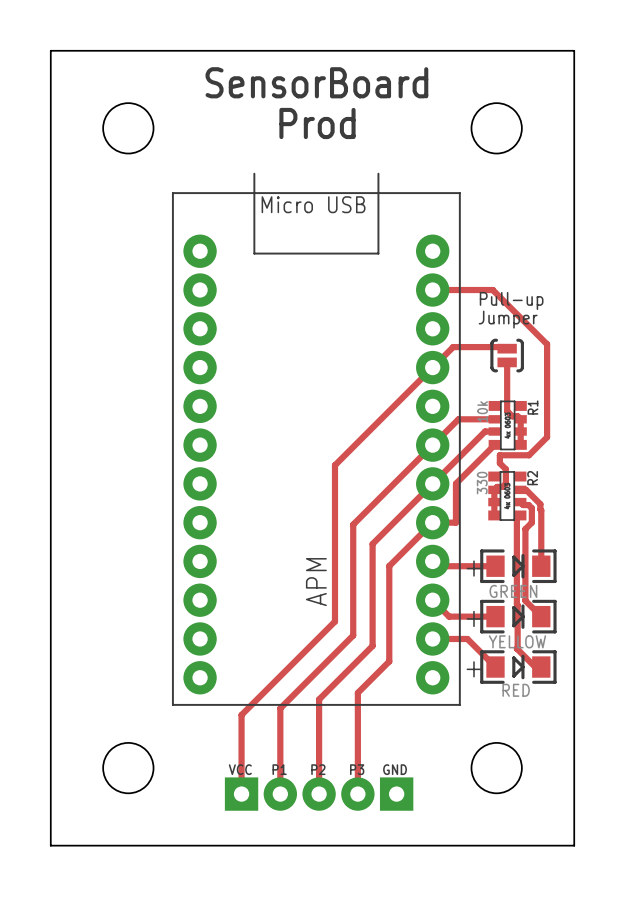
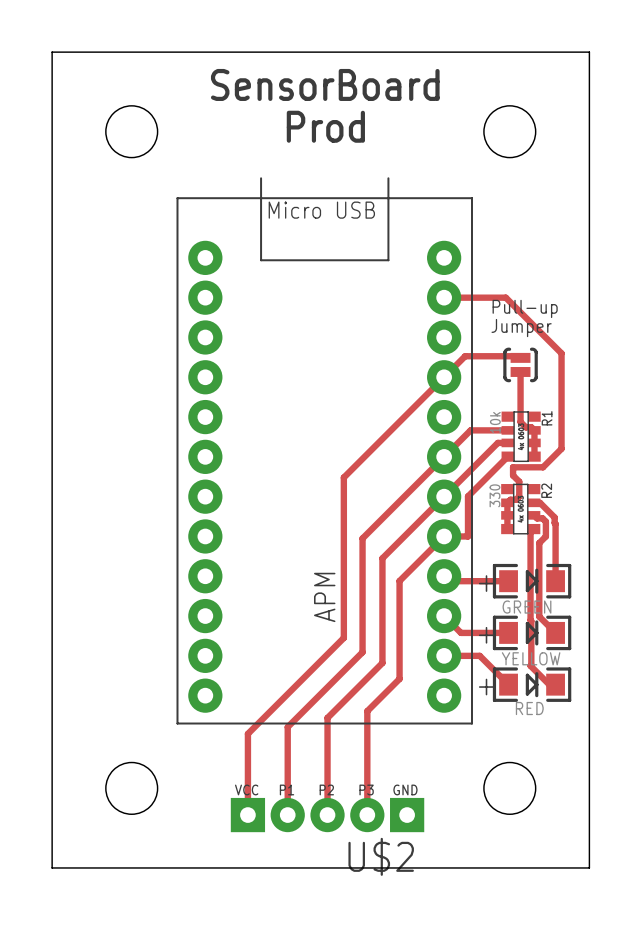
U$2 name: none -> U$2 (381, 856)

